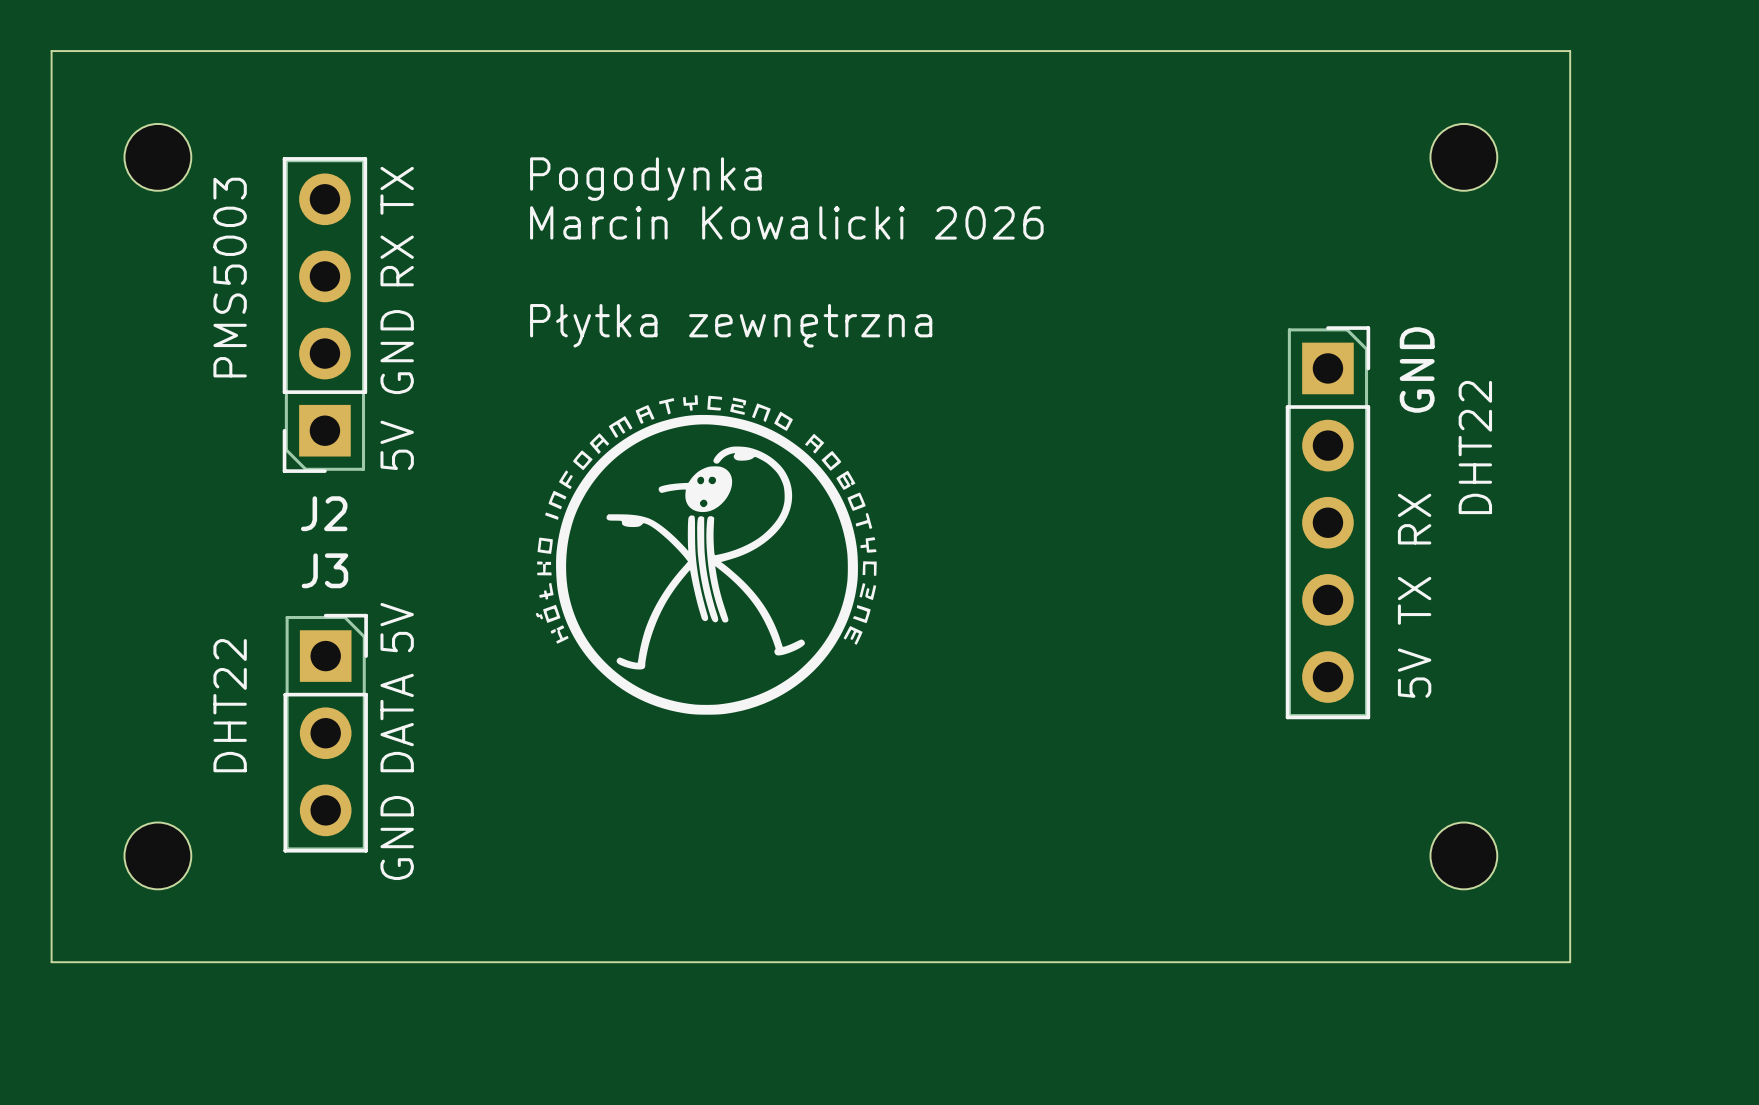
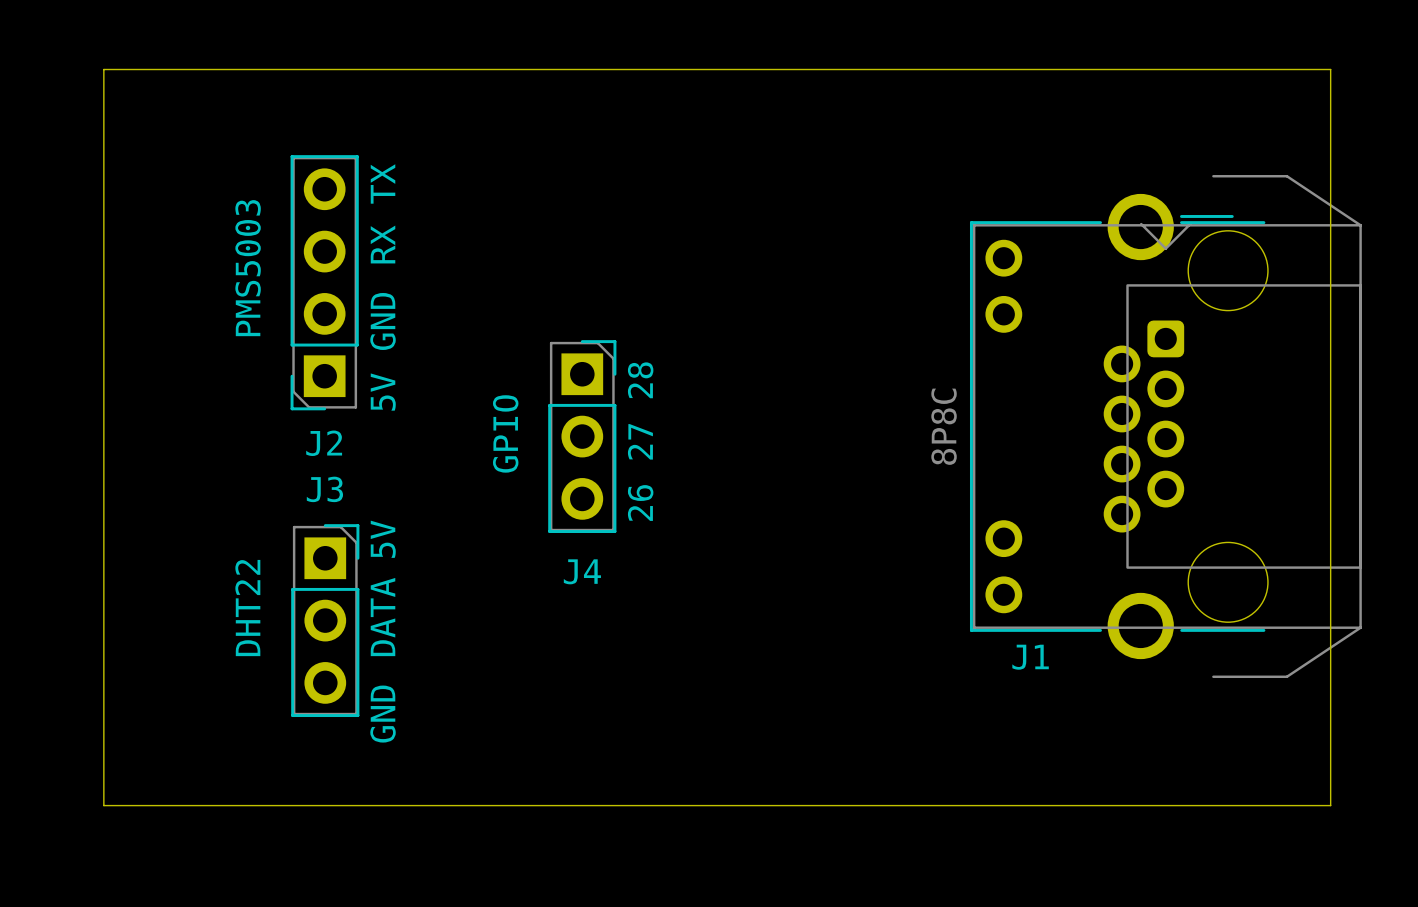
part: (157, 157) -> none
part: (1463, 157) -> none
text: Pogodynka (645, 179) -> none
text: Marcin Kowalicki 2026 (786, 222) -> none
text: Płytka zewnętrzna (731, 325) -> none
drawing: [535, 395, 877, 715] -> none
text: none -> 28 (640, 380)
text: DHT22 (1475, 447) -> none
J1: none -> 8P8C (1165, 426)
text: none -> GPIO (505, 433)
J4: none -> (582, 436)
text: none -> 27 (640, 441)
text: RX (1414, 519) -> none
GND: (1327, 522) -> none
text: none -> 26 (640, 503)
text: TX (1414, 600) -> none
text: 5V (1414, 673) -> none
part: (157, 855) -> none
part: (1463, 855) -> none

